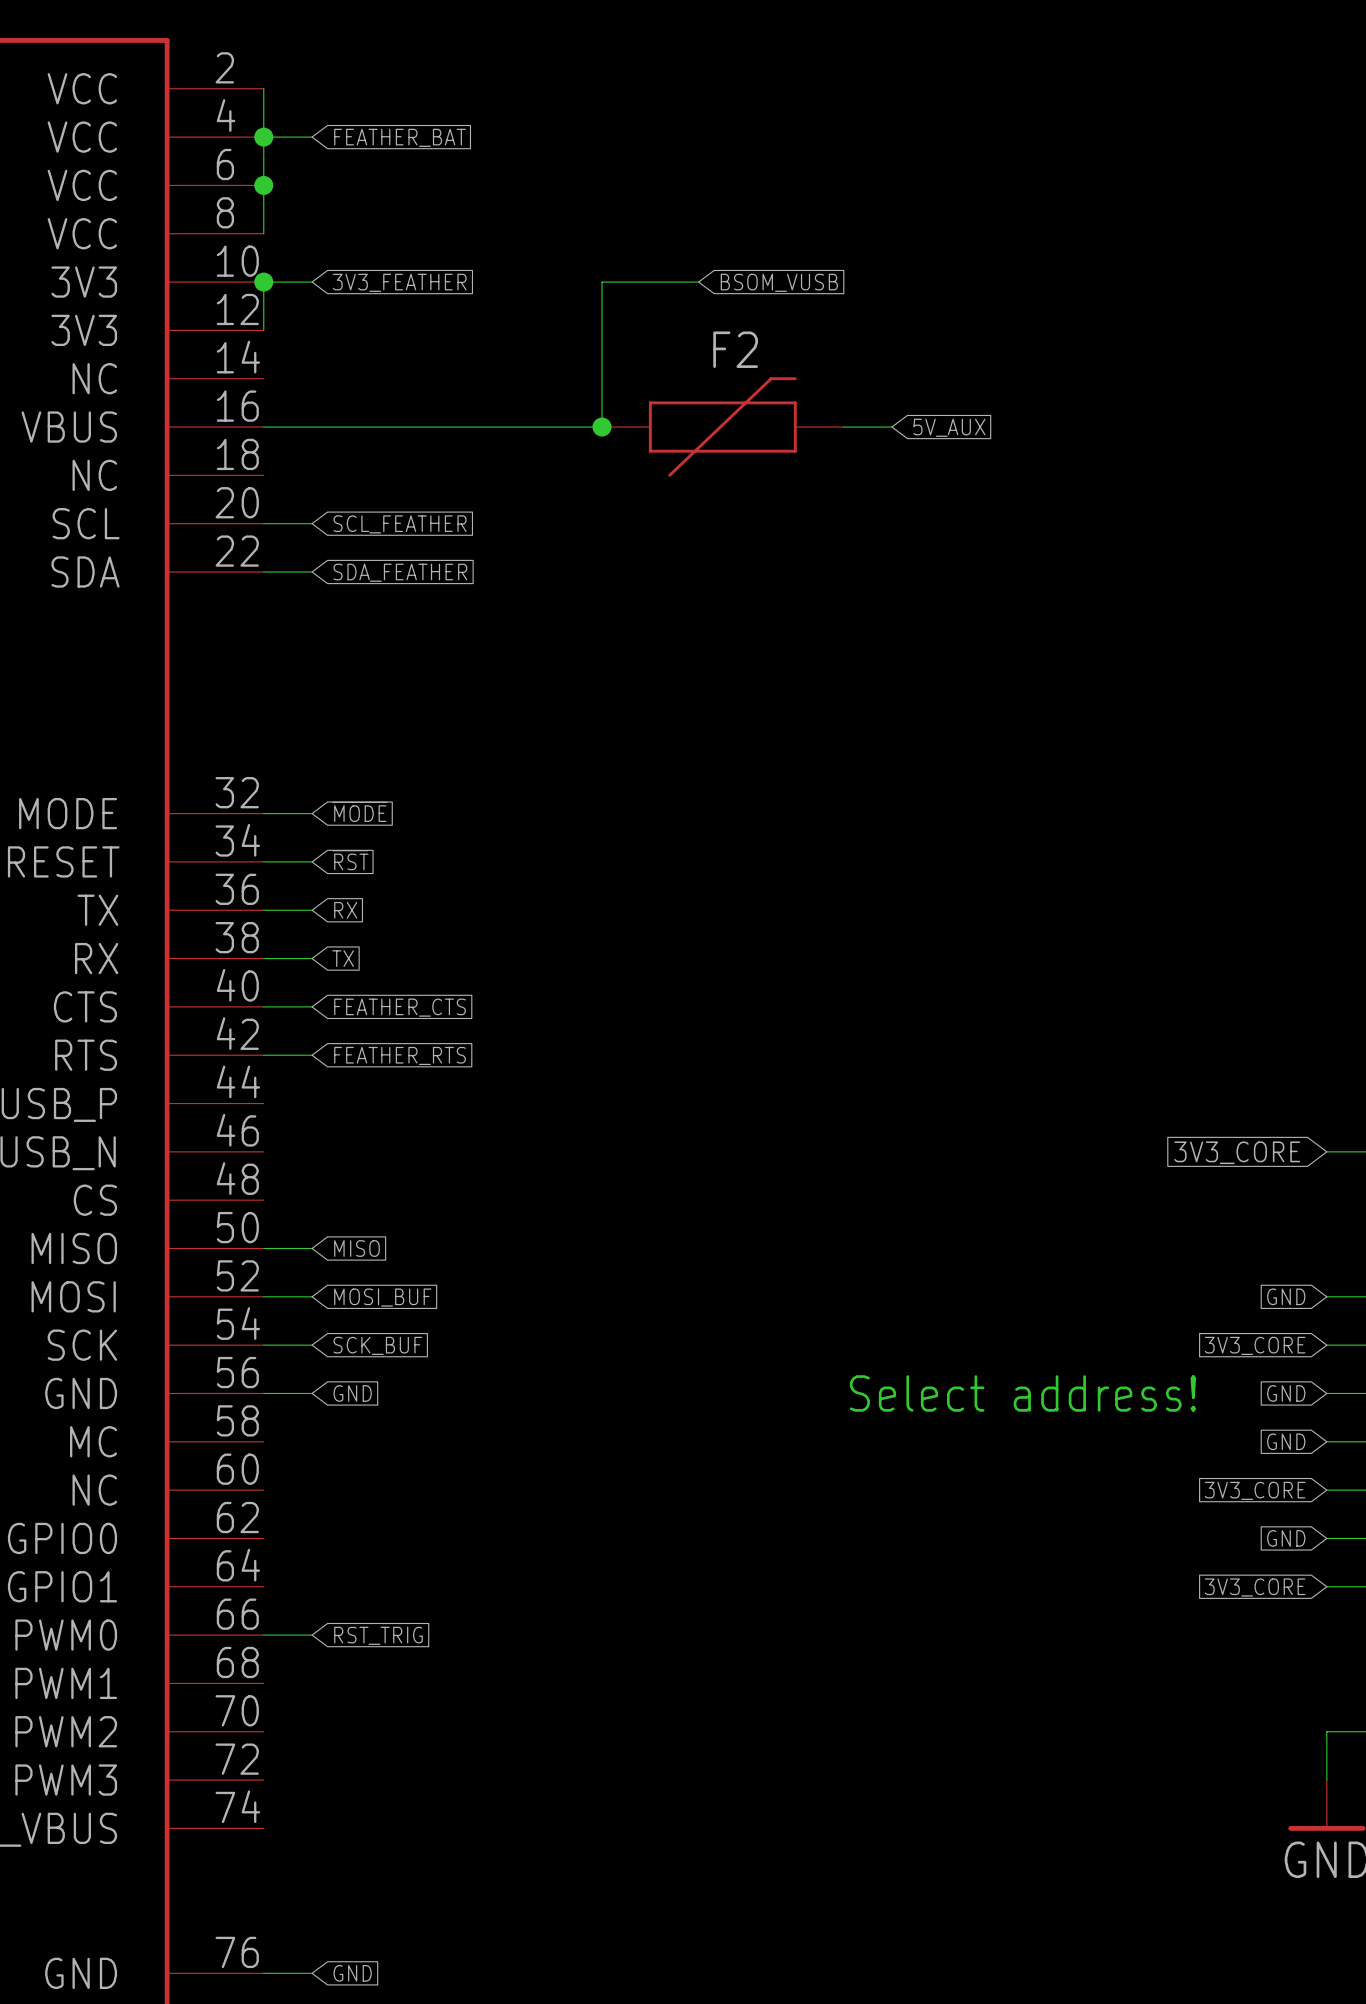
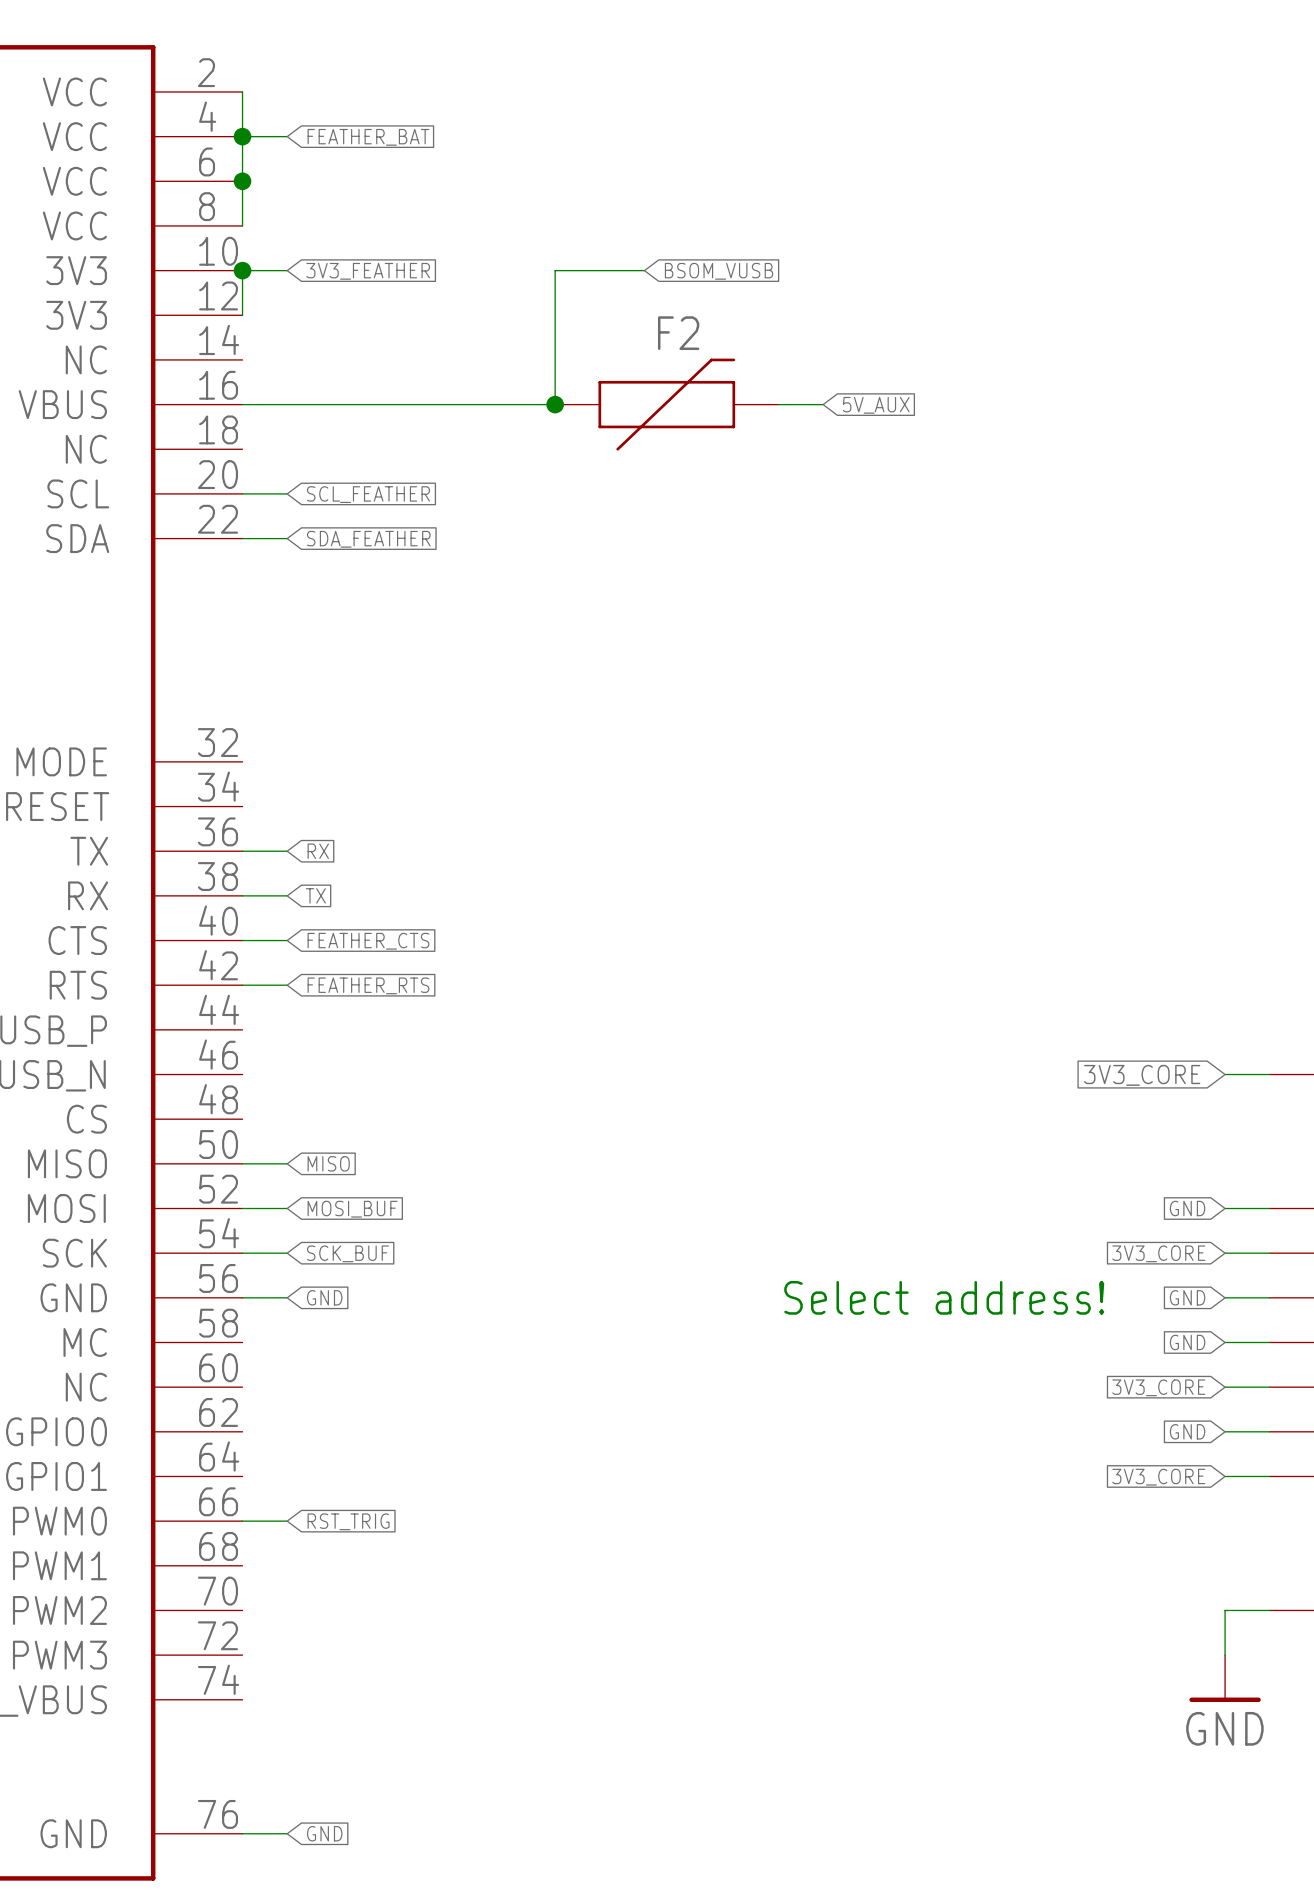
global label: ~{MODE} (359, 811) -> none
wire: (263, 813) (312, 813) -> none
global label: ~{RST} (350, 860) -> none
wire: (263, 861) (312, 861) -> none

